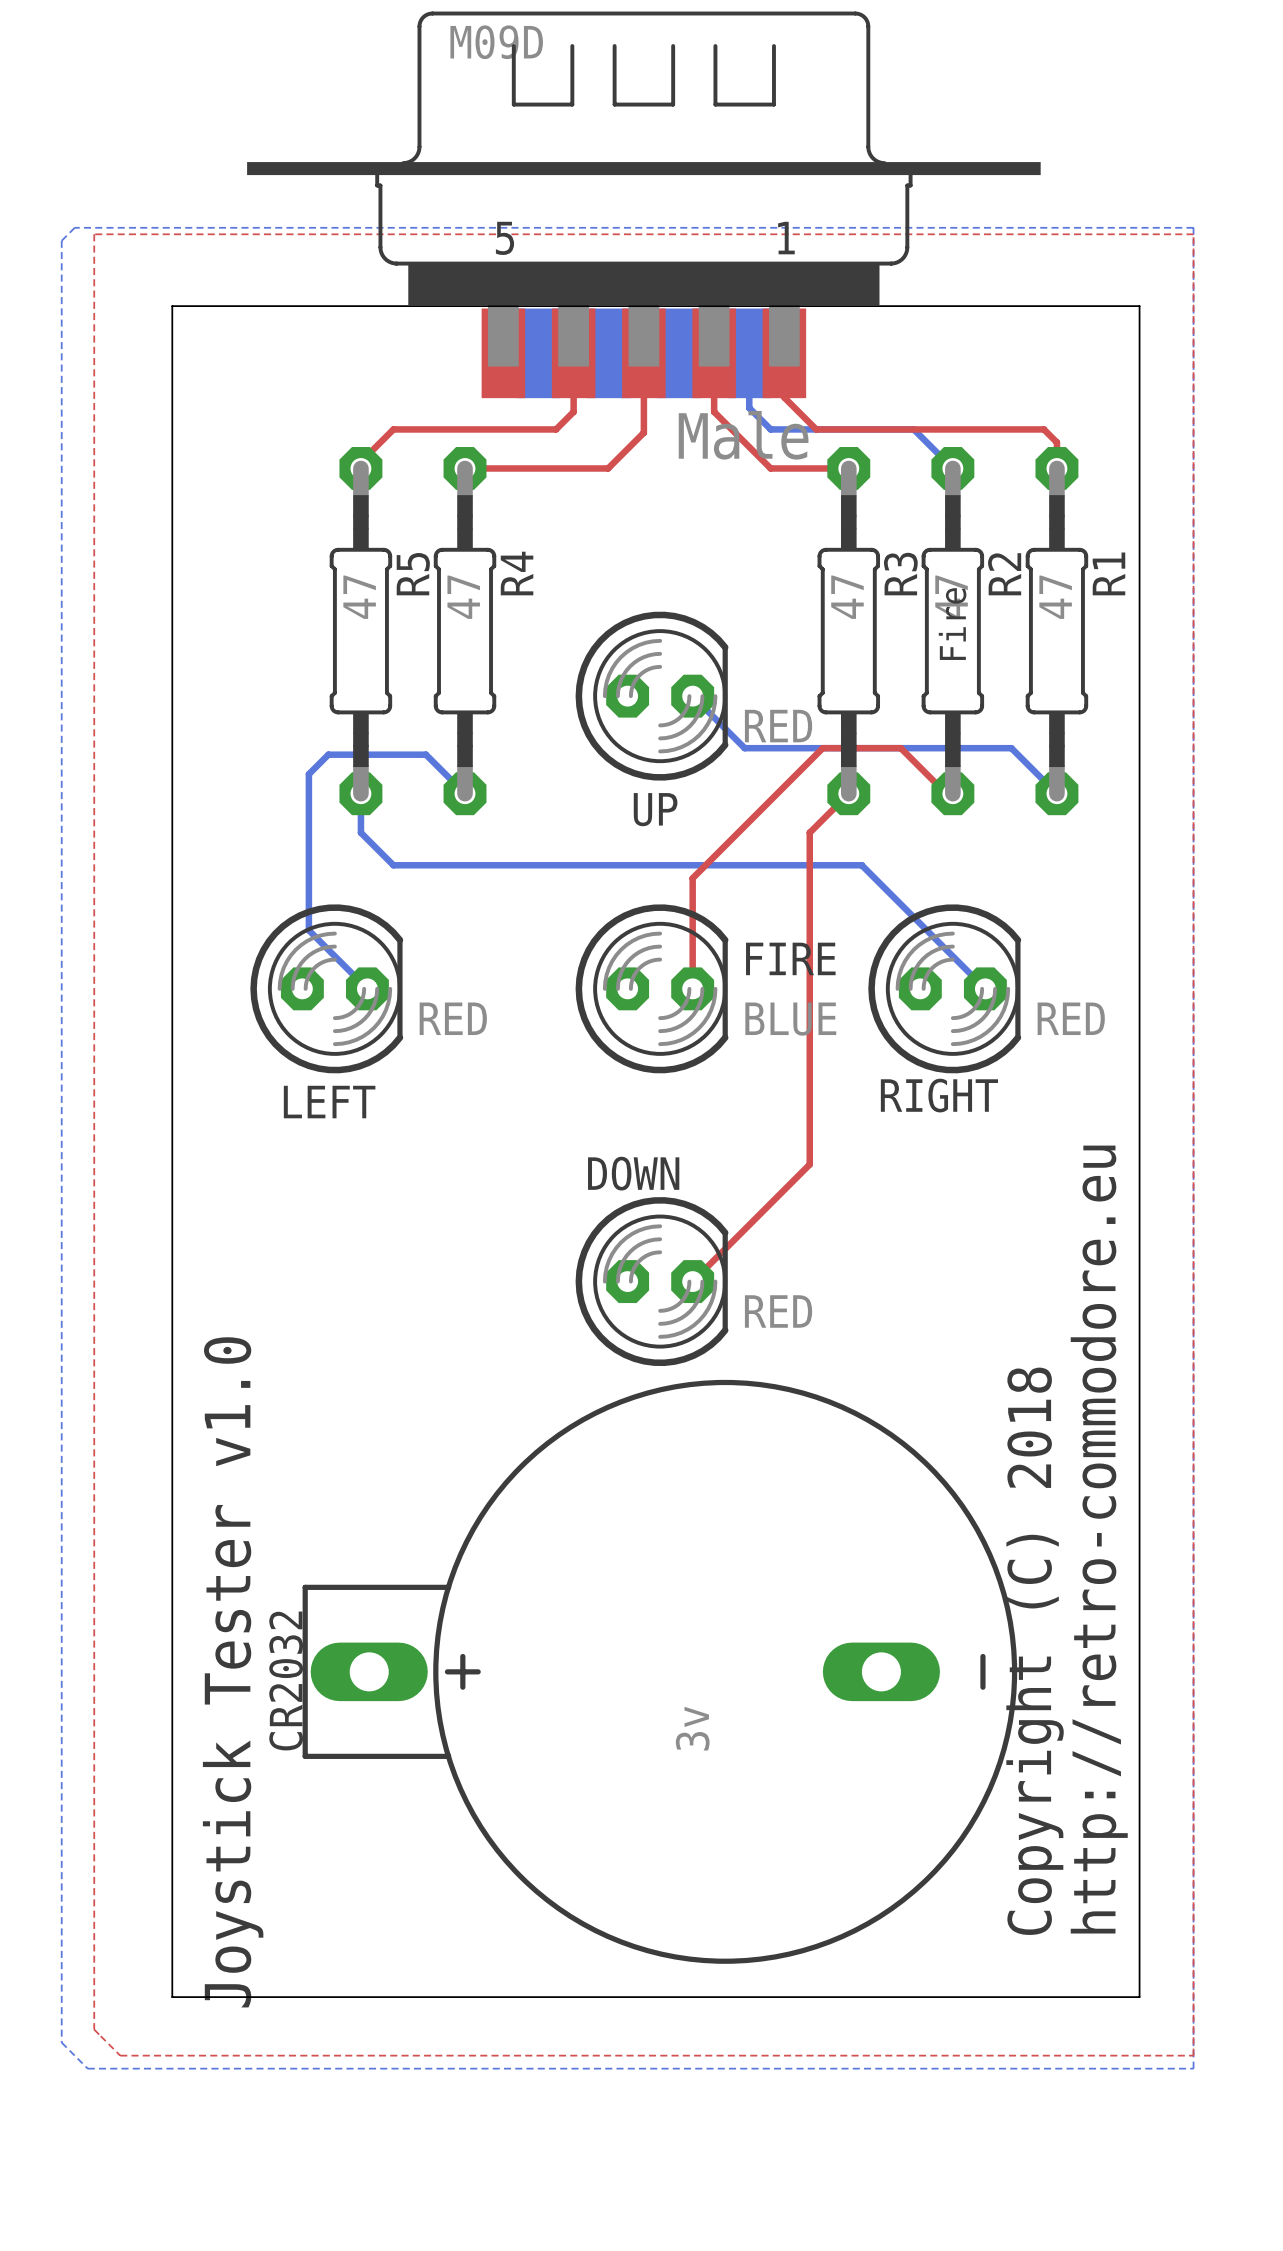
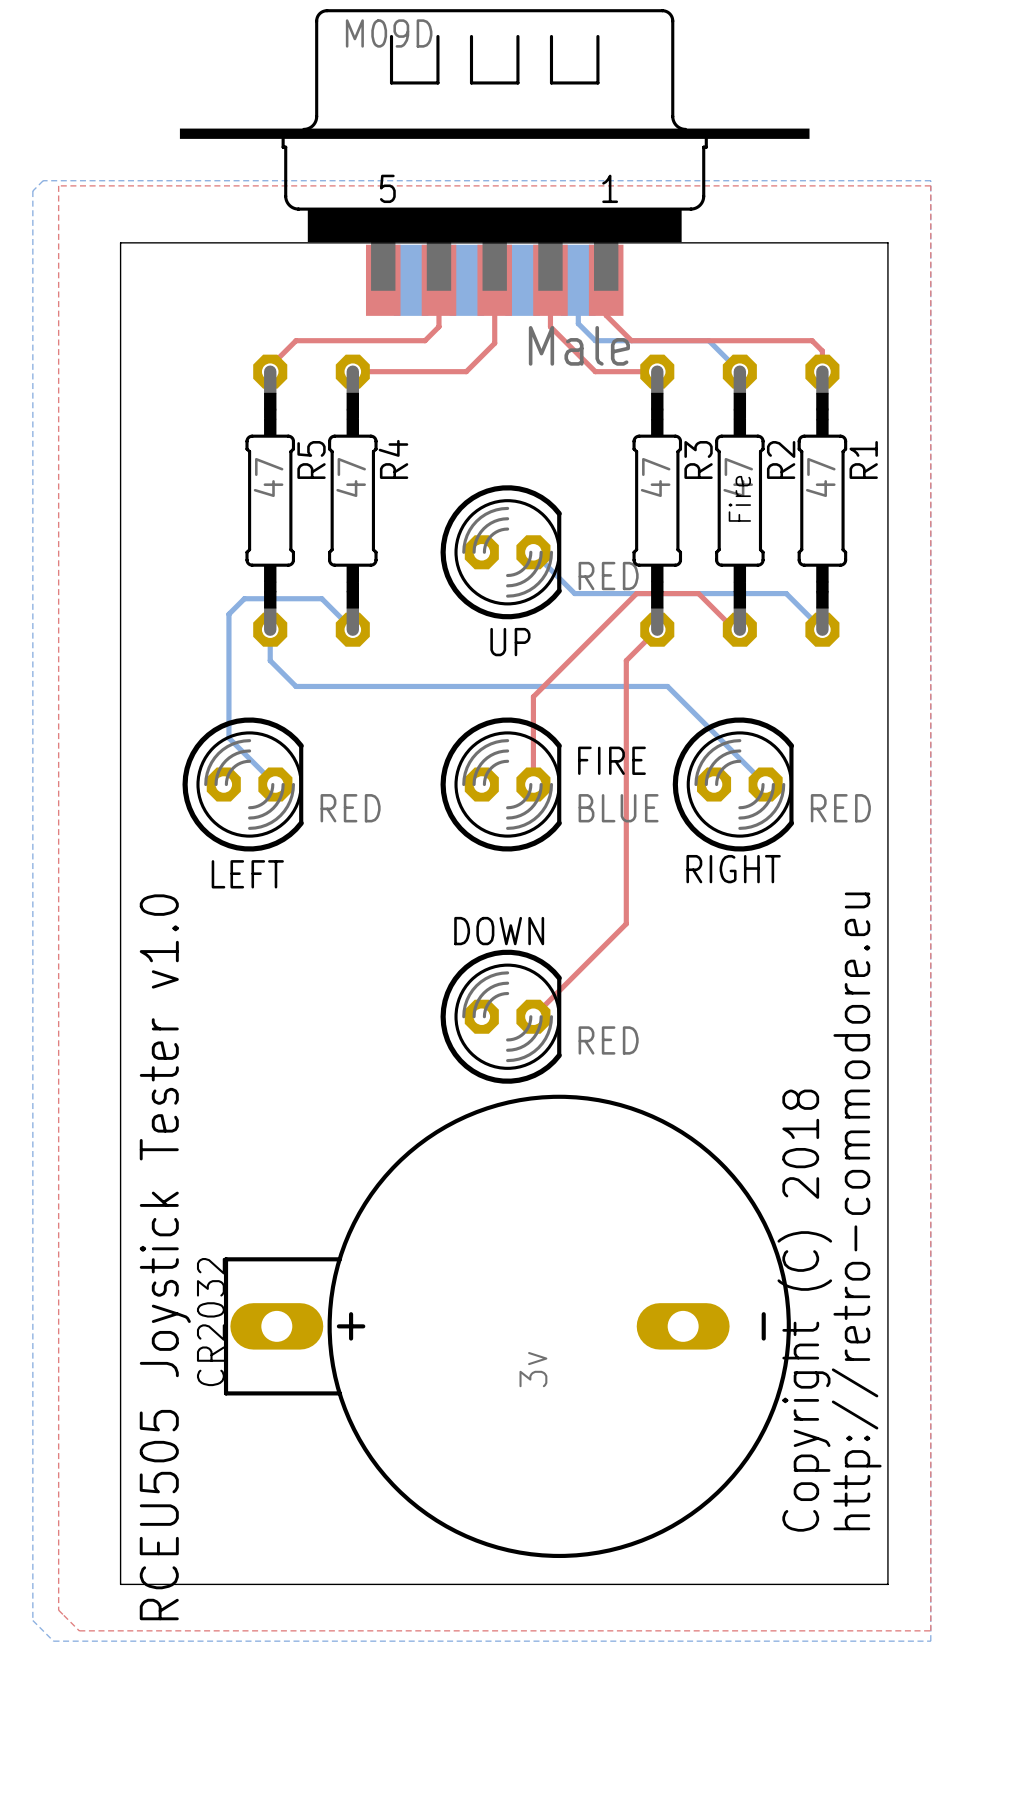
text: Joystick Tester v1.0 (233, 1672) -> RCEU505 Joystick Tester v1.0 (165, 1257)

